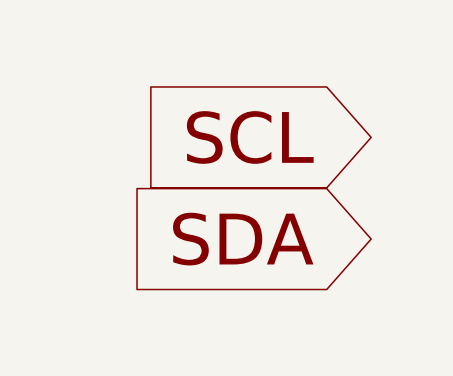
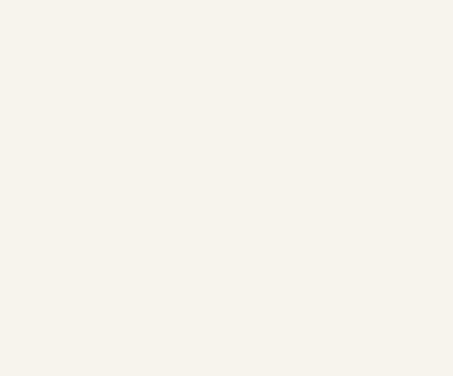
global label: SCL (250, 137) -> none
global label: SDA (243, 239) -> none

